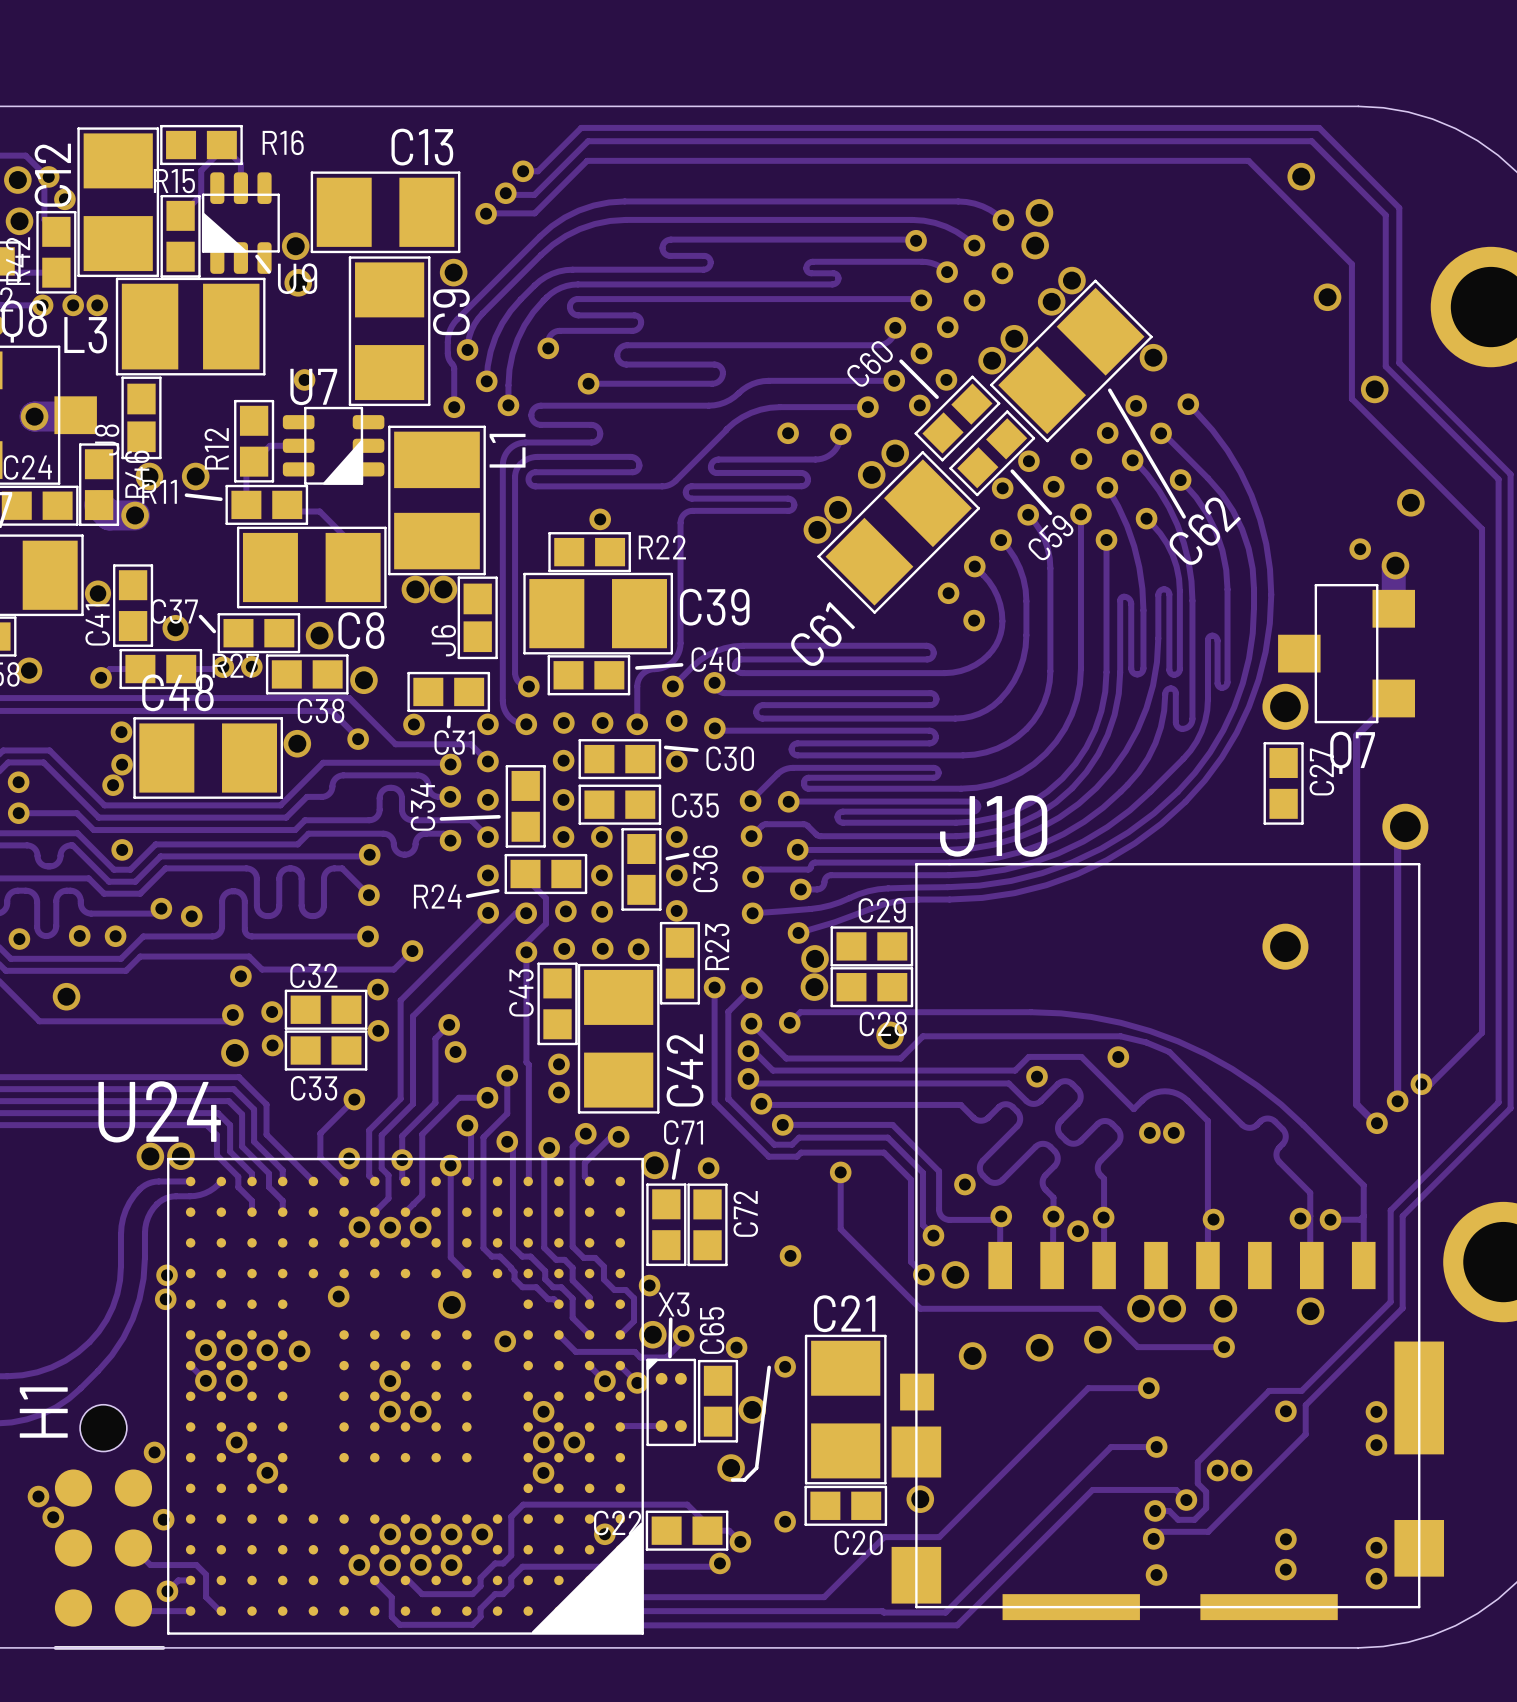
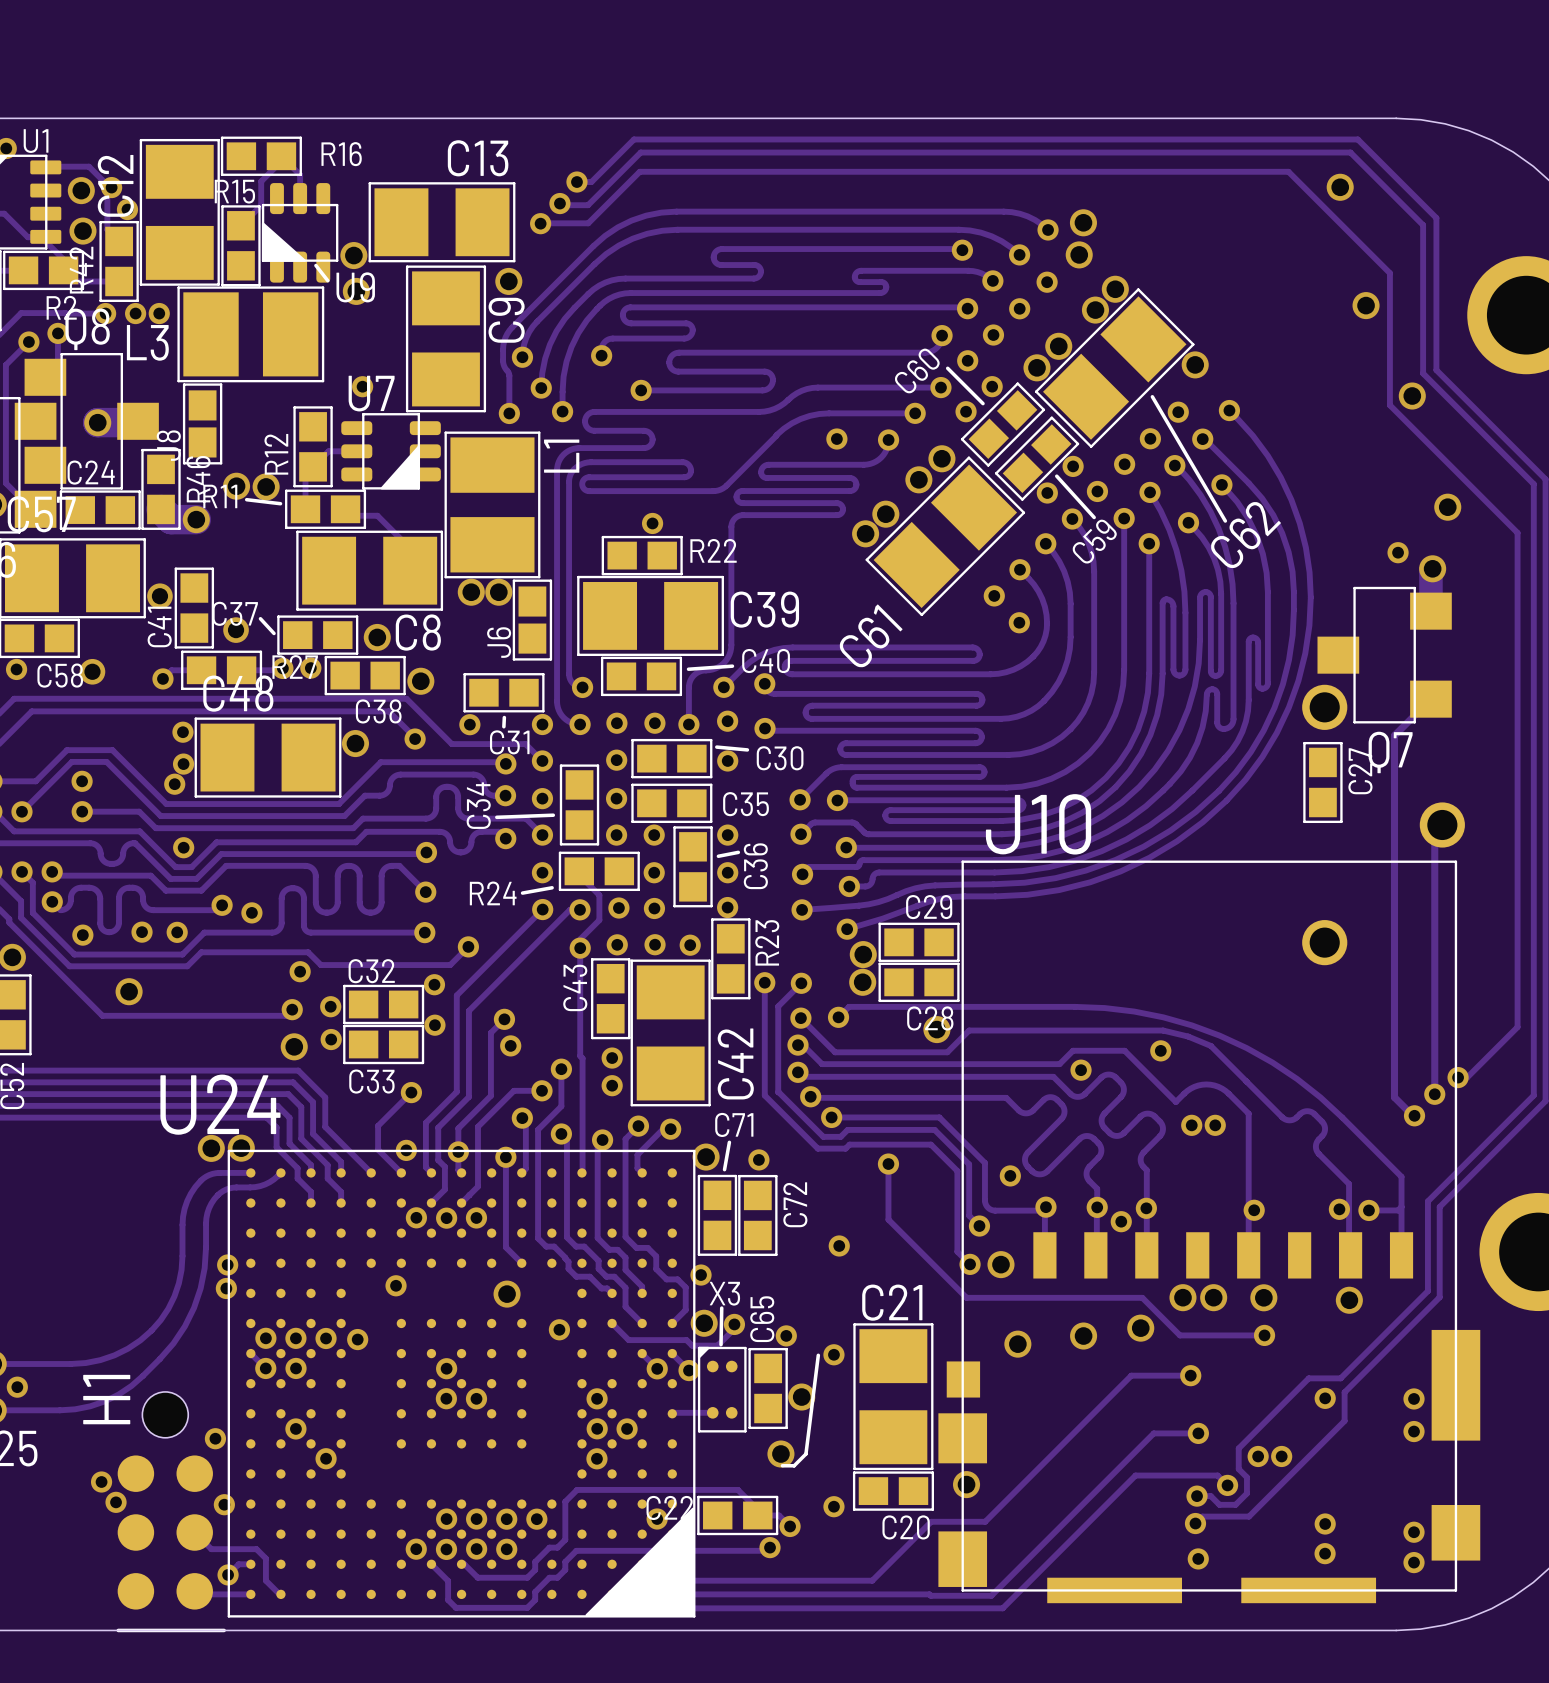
via: (149, 476) -> none
via: (195, 476) -> none
via: none -> (236, 486)
via: none -> (266, 486)

